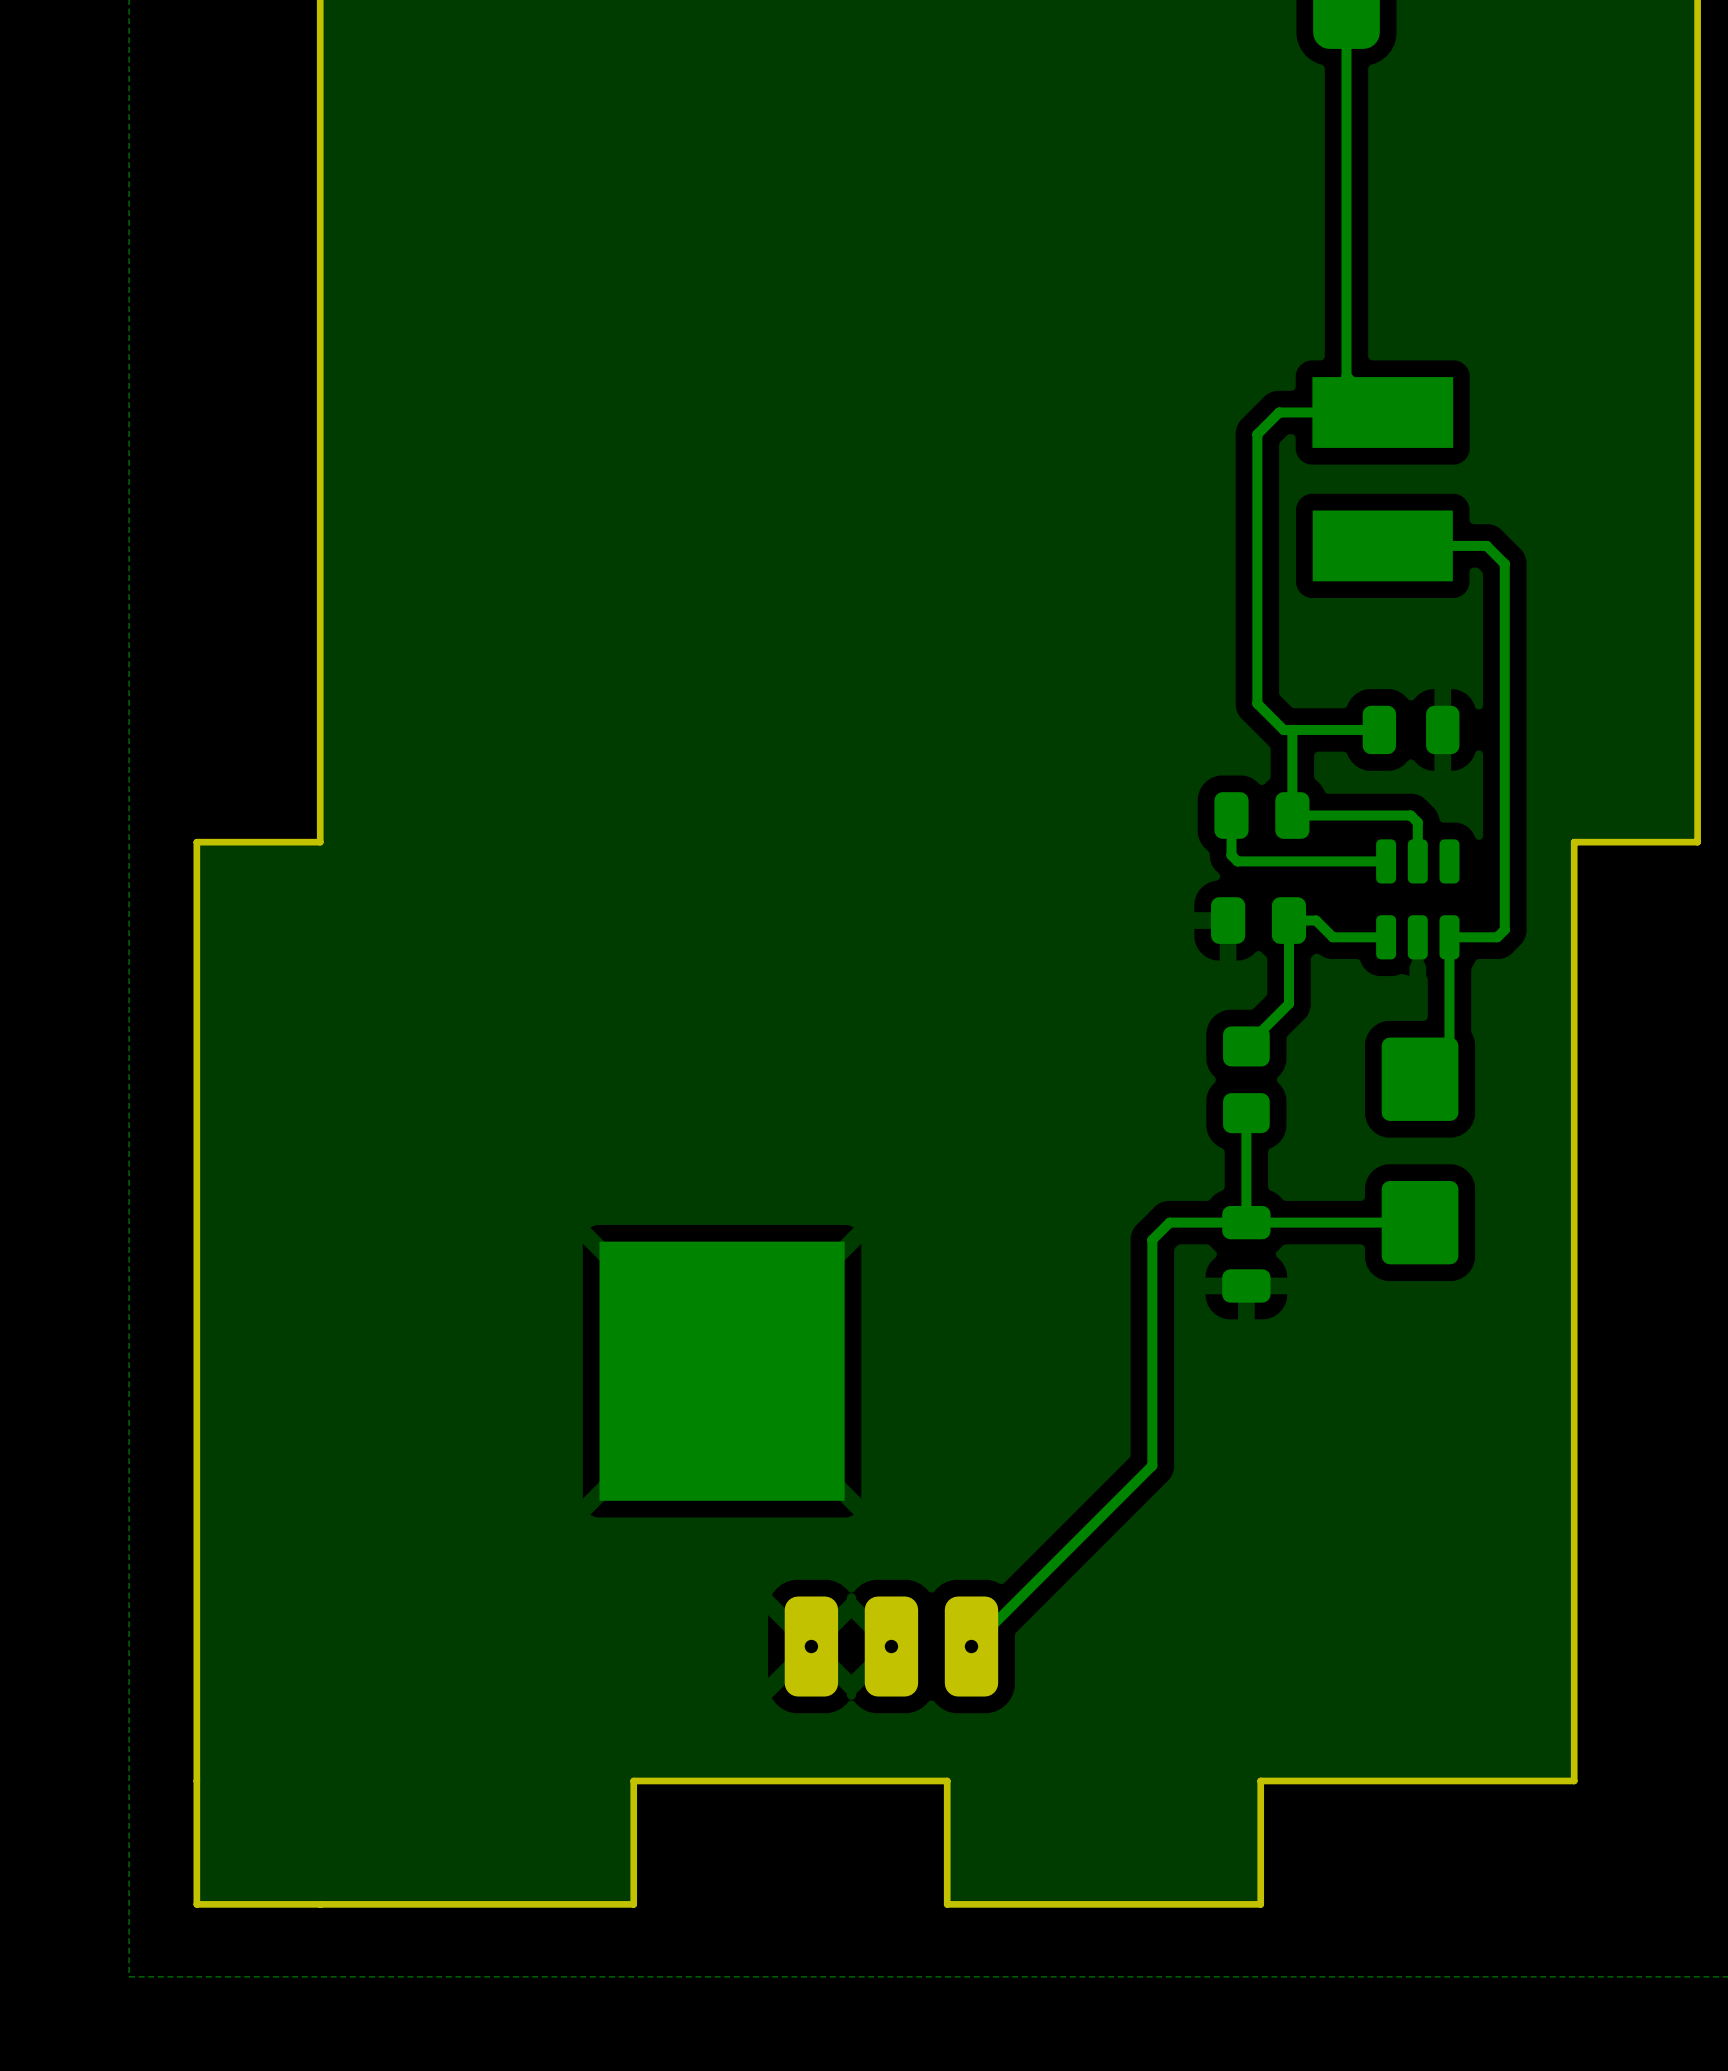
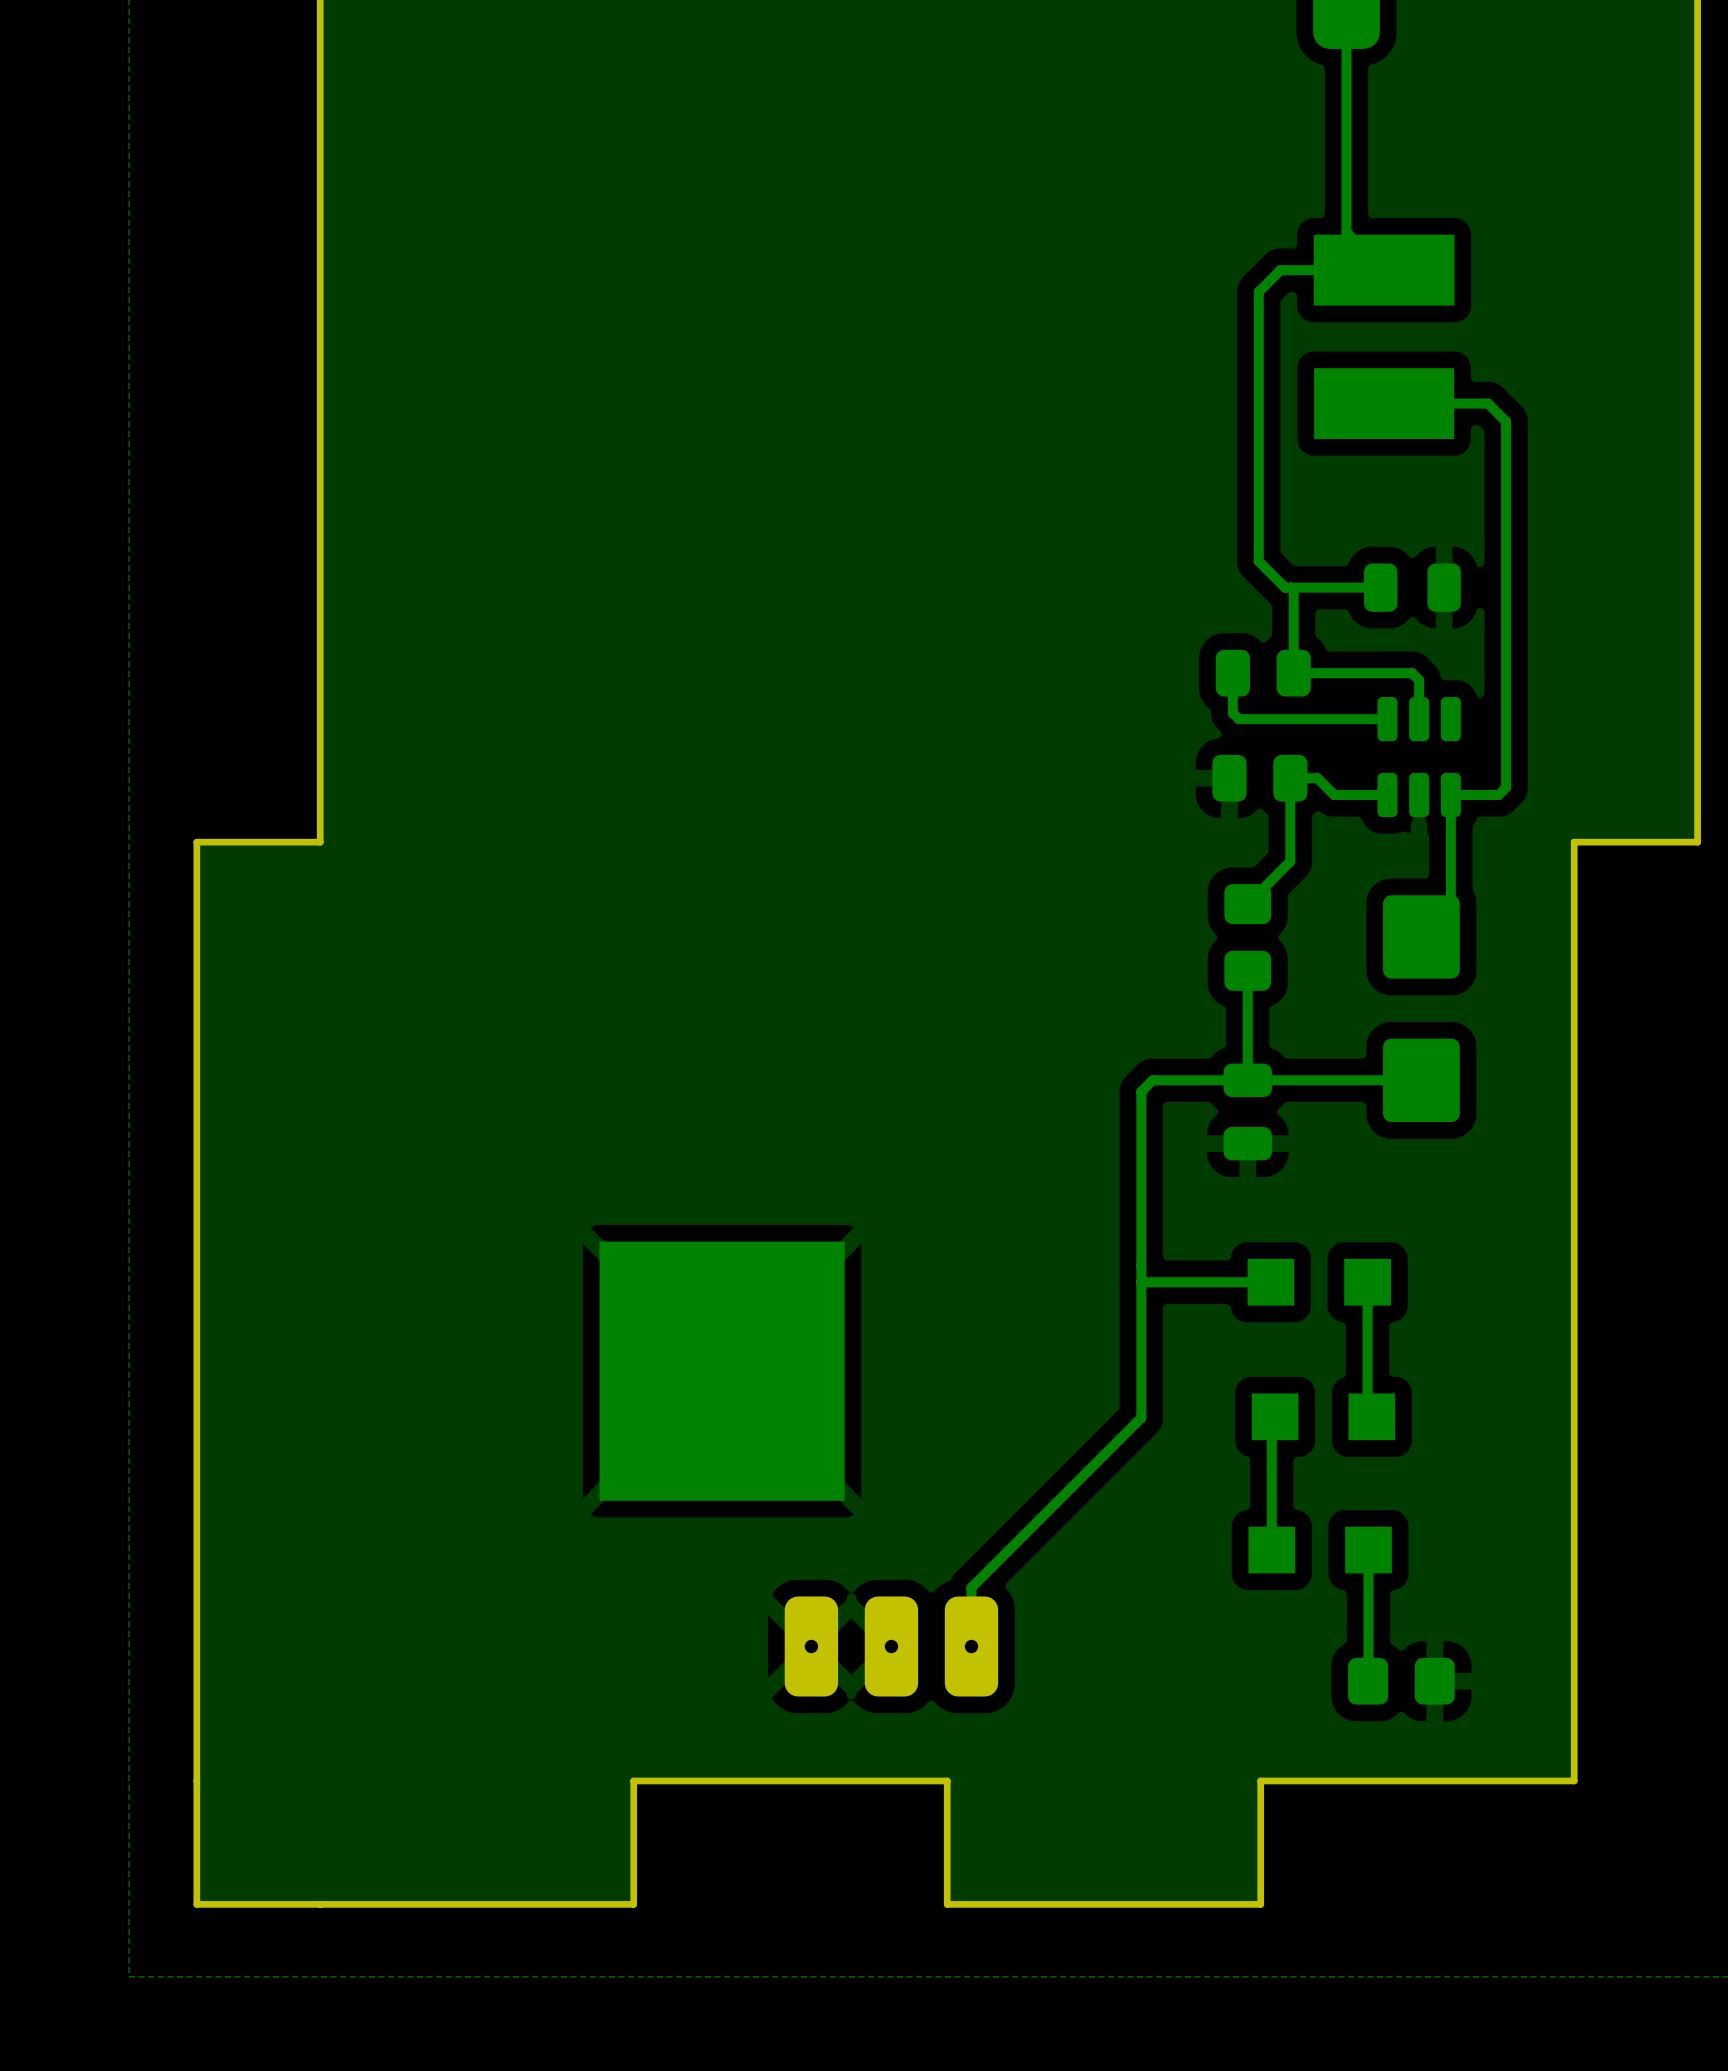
bottom track: (1346, 232) (1346, 376) (1382, 412) (1279, 412) (1257, 434) (1257, 703) (1283, 729) (1379, 729) -> (1346, 232) (1384, 270) (1280, 270) (1258, 291) (1258, 561) (1285, 587) (1380, 587)
part position: (1382, 479) -> (1384, 336)
bottom track: (1382, 545) (1486, 545) (1504, 563) (1504, 929) (1497, 937) (1449, 937) (1449, 1049) (1420, 1079) -> (1384, 403) (1488, 403) (1506, 421) (1506, 787) (1498, 794) (1450, 794) (1450, 907) (1421, 936)
part: none -> (1263, 673)
part footprint: [1362, 705, 1460, 755] -> [1377, 697, 1461, 818]
bottom track: (1289, 729) (1292, 732) (1292, 815) (1410, 815) (1417, 822) (1417, 861) -> (1290, 587) (1293, 590) (1293, 673) (1412, 673) (1419, 680) (1419, 719)
bottom track: (1231, 815) (1231, 855) (1237, 861) (1386, 861) -> (1232, 673) (1232, 713) (1238, 719) (1387, 719)
part position: (1261, 815) -> (1259, 778)
part footprint: [1211, 897, 1307, 944] -> [1224, 884, 1272, 991]
part: (1417, 899) -> none
bottom track: (1386, 937) (1332, 937) (1316, 920) (1288, 920) (1288, 1003) (1246, 1046) -> (1387, 794) (1334, 794) (1317, 778) (1290, 778) (1290, 861) (1247, 904)
part footprint: [1223, 1026, 1270, 1134] -> [1223, 1063, 1272, 1161]
bottom track: (1246, 1113) (1246, 1222) -> (1247, 970) (1247, 1080)
part position: (1420, 1150) -> (1421, 1008)
bottom track: (1420, 1222) (1169, 1222) (1152, 1239) (1152, 1465) (972, 1645) -> (1421, 1080) (1152, 1080) (1141, 1091) (1141, 1417) (971, 1587) (971, 1646)
part rotation: 0° (1246, 1254) -> 90° clockwise (1412, 587)
part position: (1246, 1254) -> (1412, 587)
bottom track: none -> (1141, 1282) (1270, 1282)
part: none -> (1319, 1282)
bottom track: none -> (1367, 1282) (1367, 1412) (1371, 1416)
bottom track: none -> (1275, 1416) (1271, 1420) (1271, 1550)
part: none -> (1323, 1416)
part: none -> (1320, 1550)
bottom track: none -> (1368, 1550) (1368, 1680)
part: none -> (1401, 1681)

